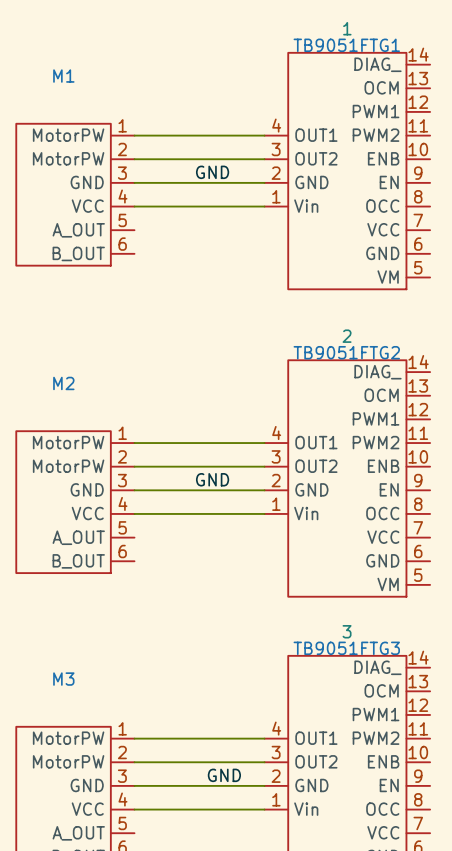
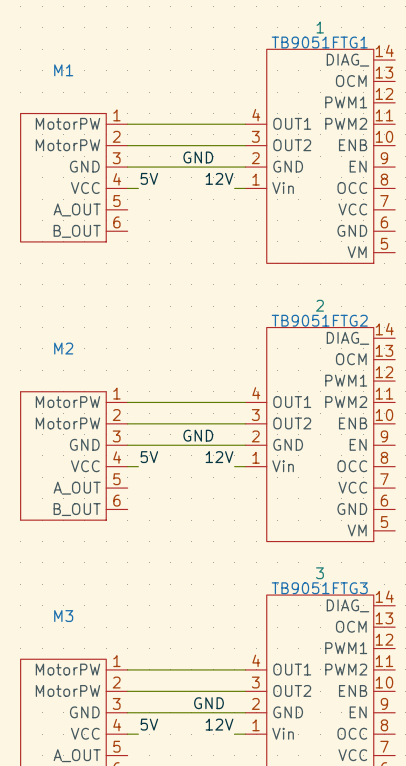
label: none -> 5V (149, 178)
label: none -> 12V (219, 178)
wire: (146, 206) (252, 206) -> none
label: none -> 5V (149, 457)
label: none -> 12V (219, 457)
wire: (146, 513) (252, 513) -> none
label: none -> 5V (149, 724)
label: none -> 12V (219, 724)
wire: (146, 809) (252, 809) -> none

